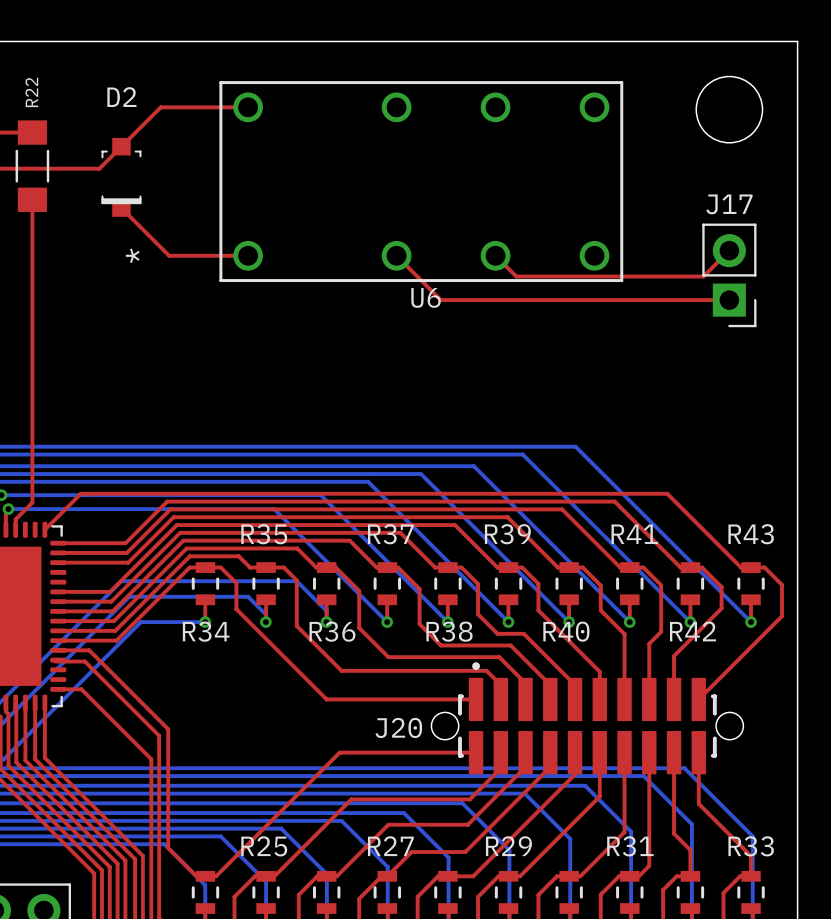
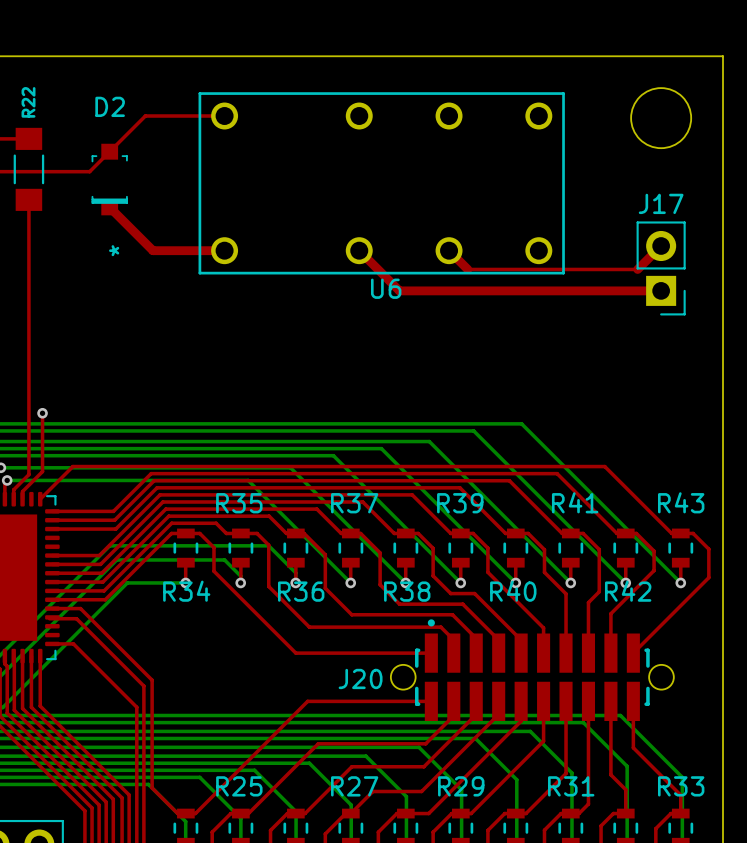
top track width: thin (121, 208) (169, 255) (248, 255) -> thick (109, 207) (153, 250) (224, 250)
top track width: thin (729, 250) (703, 276) -> thick (661, 246) (637, 269)
top track width: thin (396, 255) (440, 300) (729, 300) -> thick (359, 250) (399, 290) (661, 290)
top track width: thin (495, 255) (516, 276) -> thick (449, 250) (467, 269)
top track: none -> (42, 413) (42, 471) (22, 491) (22, 499)
via: none -> (42, 413)

